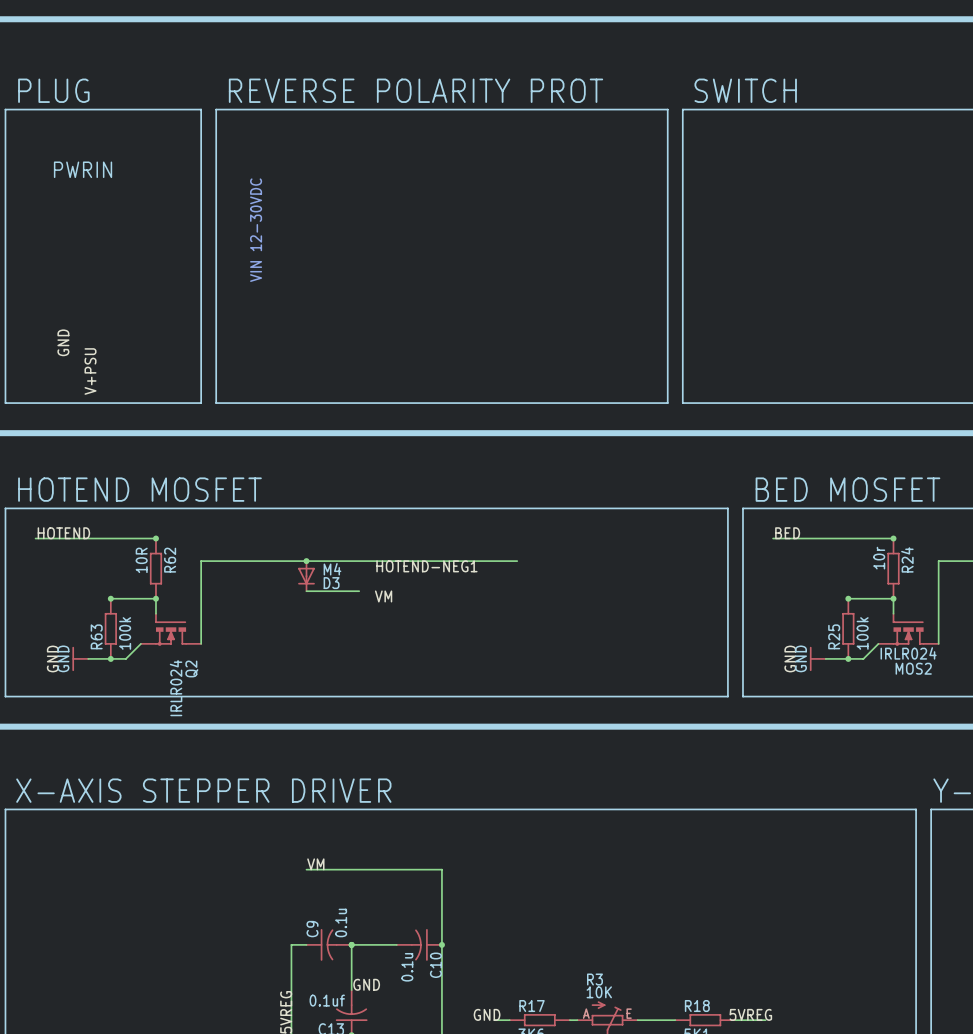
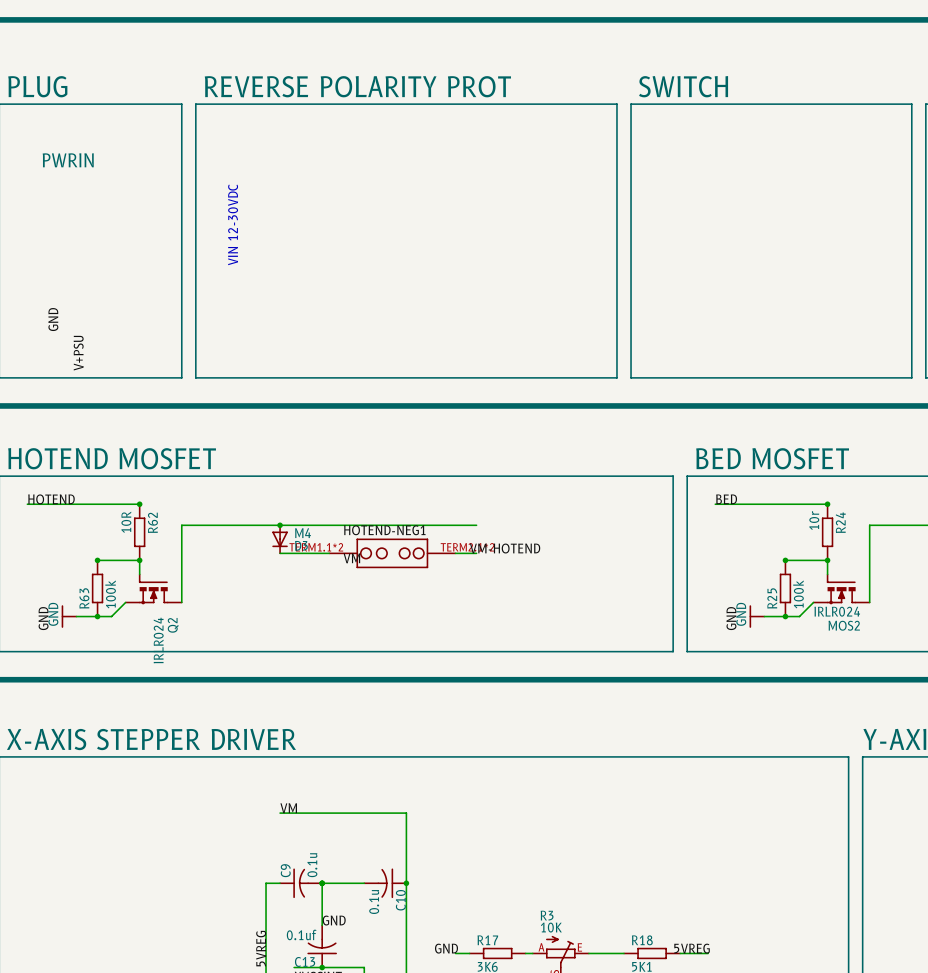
label: none -> VM-HOTEND (505, 548)
part: none -> (392, 553)
wire: none -> (455, 553) (476, 553)

